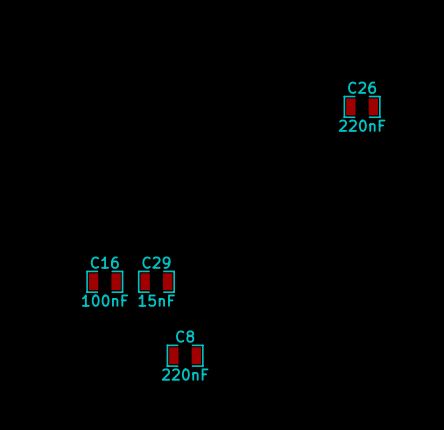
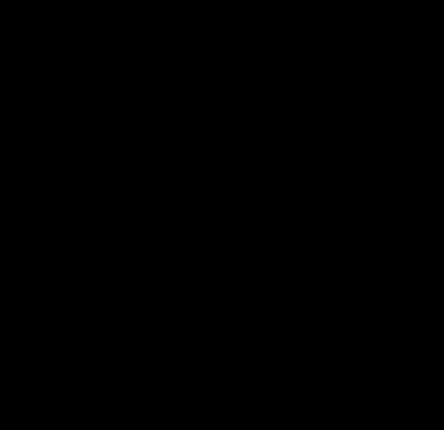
C26: 220nF (362, 106) -> none
C16: 100nF (104, 281) -> none
C29: 15nF (156, 281) -> none
C8: 220nF (185, 355) -> none

